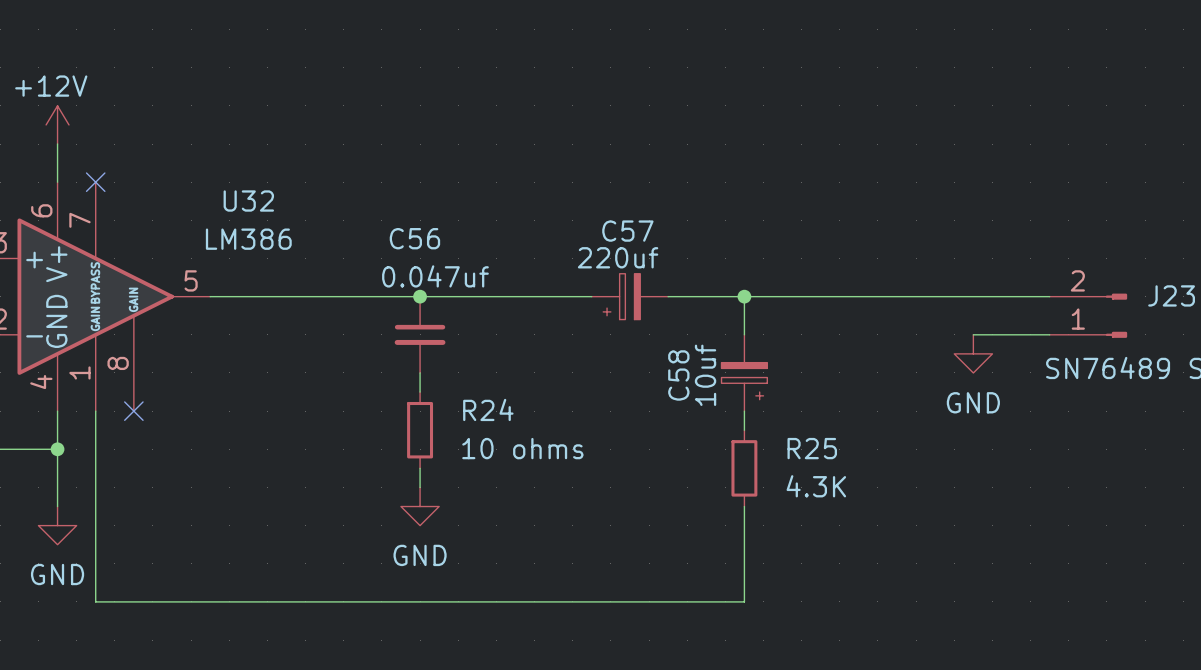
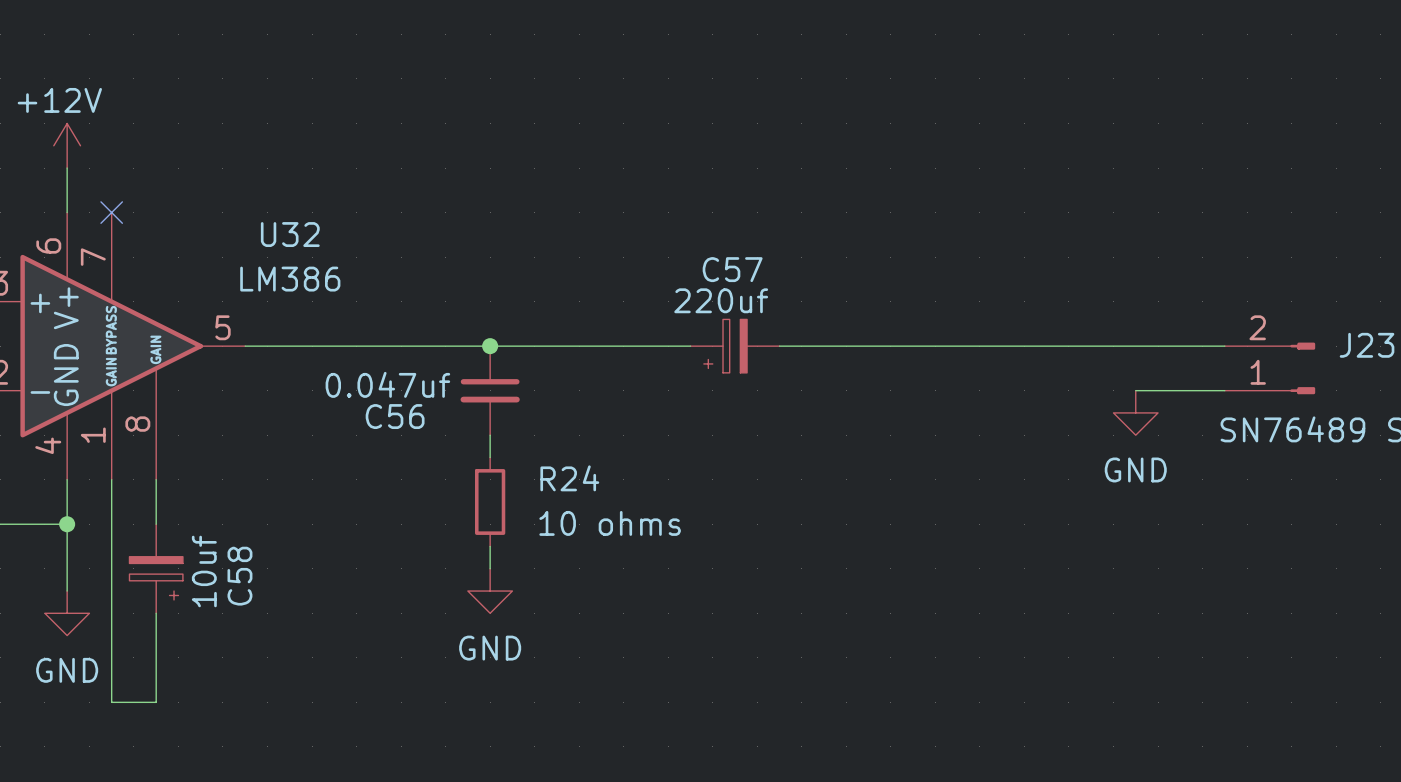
C56 name position: C56 (414, 238) -> C56 (395, 416)
C56 value position: 0.047uf (435, 276) -> 0.047uf (387, 384)
wire: (744, 296) (744, 334) -> none
junction: (744, 296) -> none
C58 position: (744, 372) -> (156, 568)
C58 name position: C58 (678, 375) -> C58 (239, 576)
C58 value position: 10uf (705, 375) -> 10uf (204, 571)
wire: none -> (156, 479) (156, 524)
no-connect mark: (133, 411) -> none
wire: (744, 411) (744, 430) -> none
R25: 4.3K (744, 468) -> none
wire: (744, 506) (744, 601) (133, 601) -> (156, 613) (156, 702)

